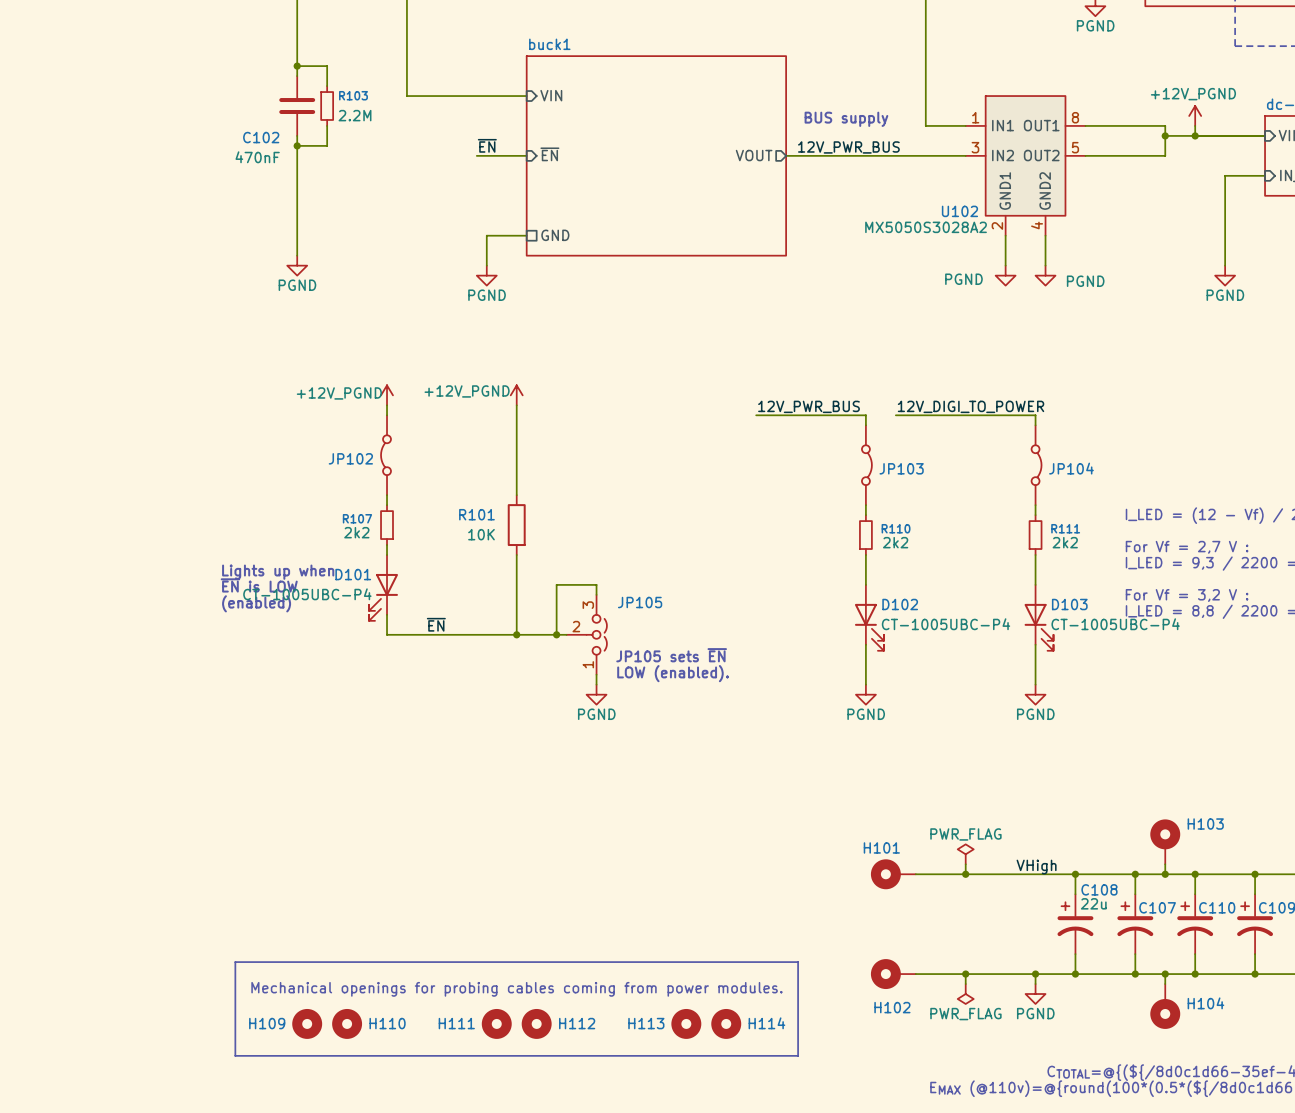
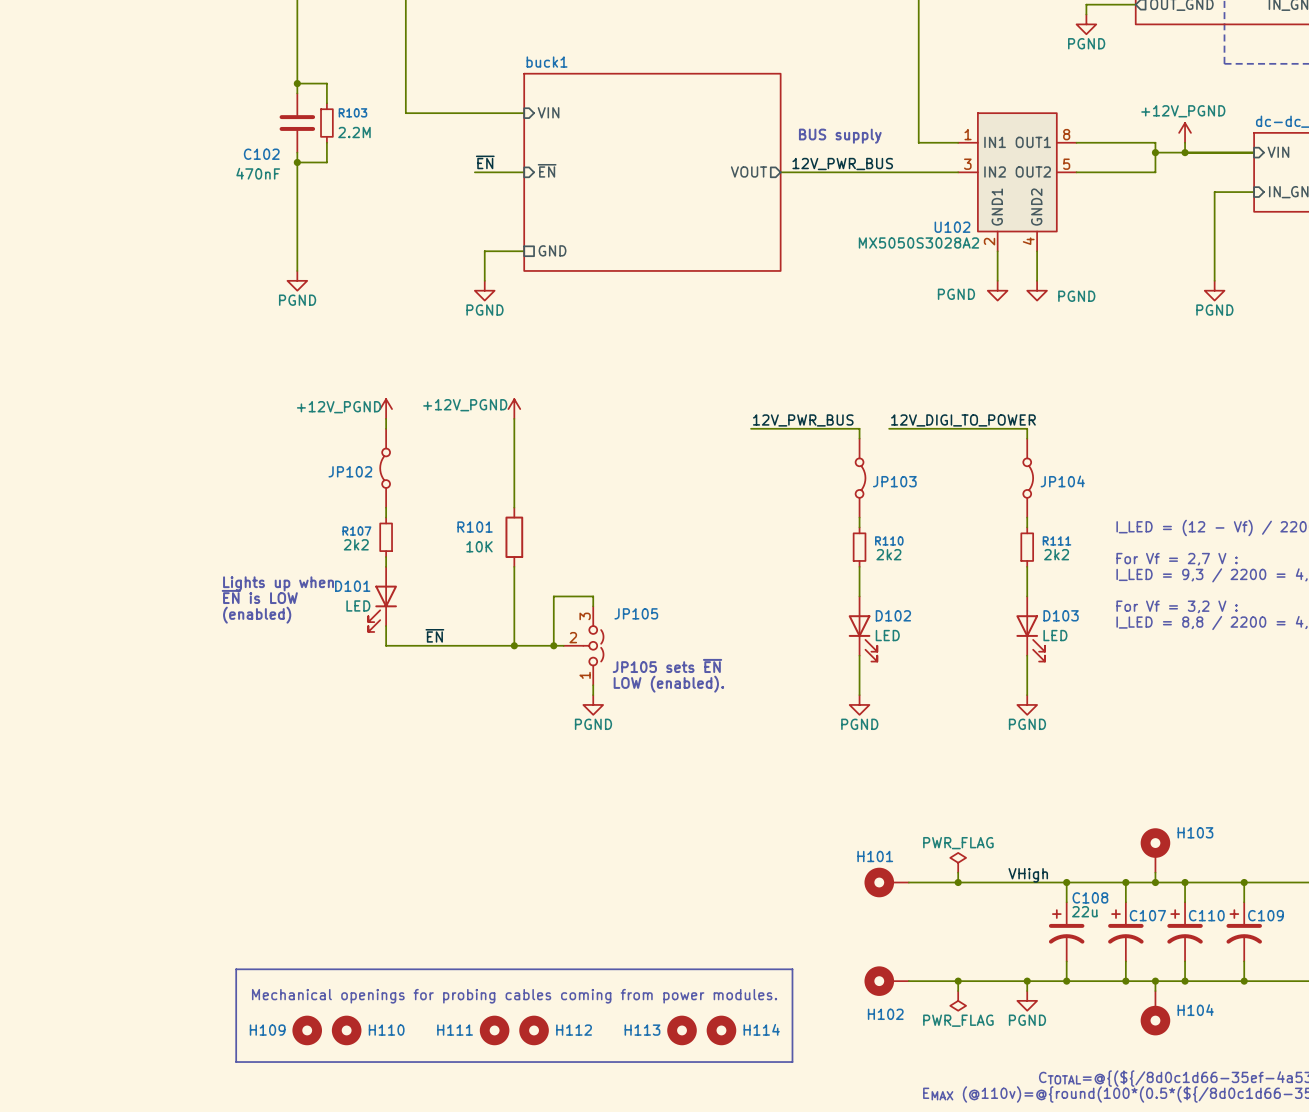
D101 value: CT-1005UBC-P4 (307, 594) -> LED (358, 605)
D102 value: CT-1005UBC-P4 (946, 624) -> LED (887, 635)
D103 value: CT-1005UBC-P4 (1115, 624) -> LED (1055, 635)

